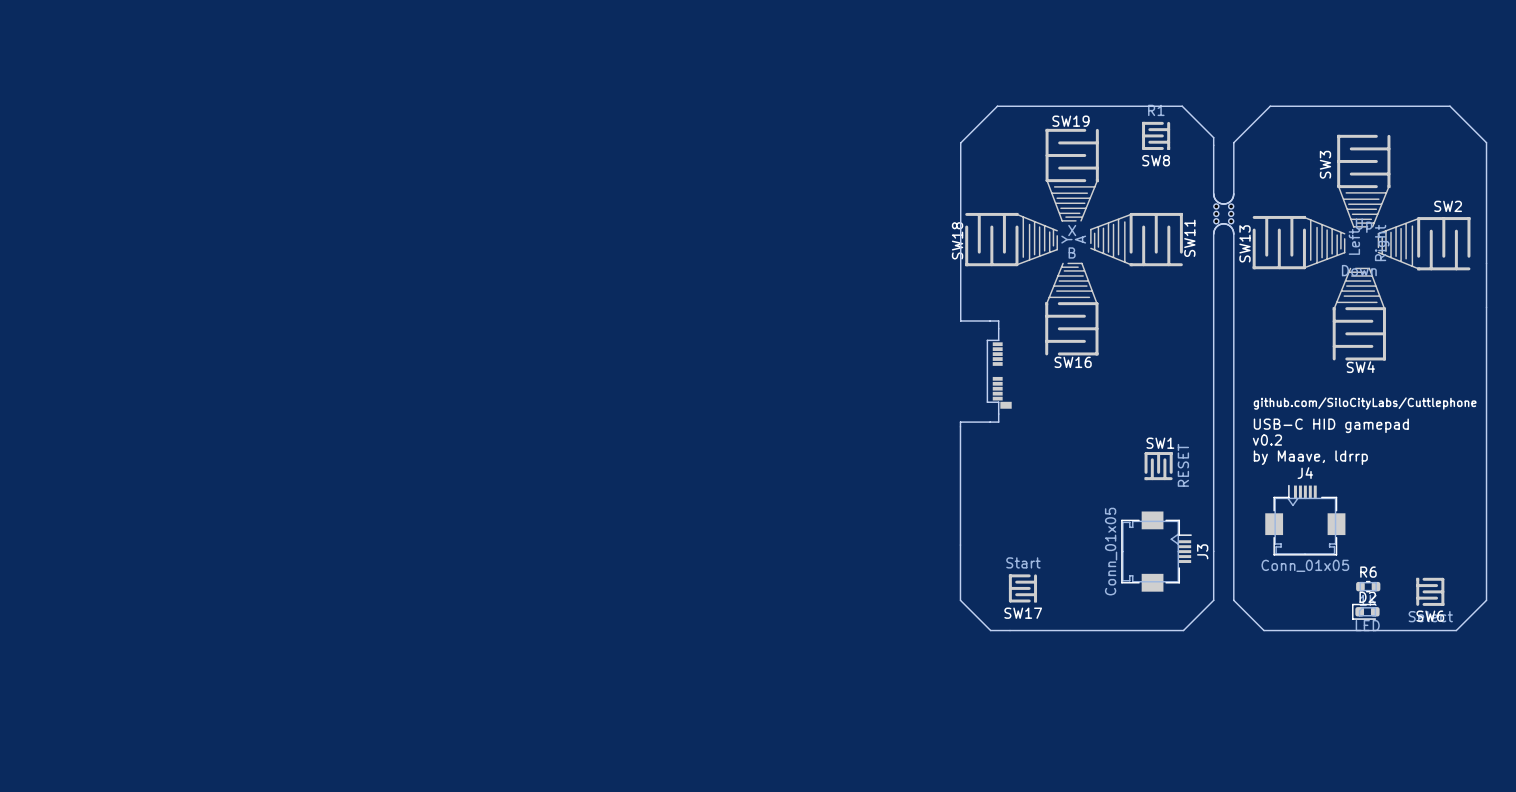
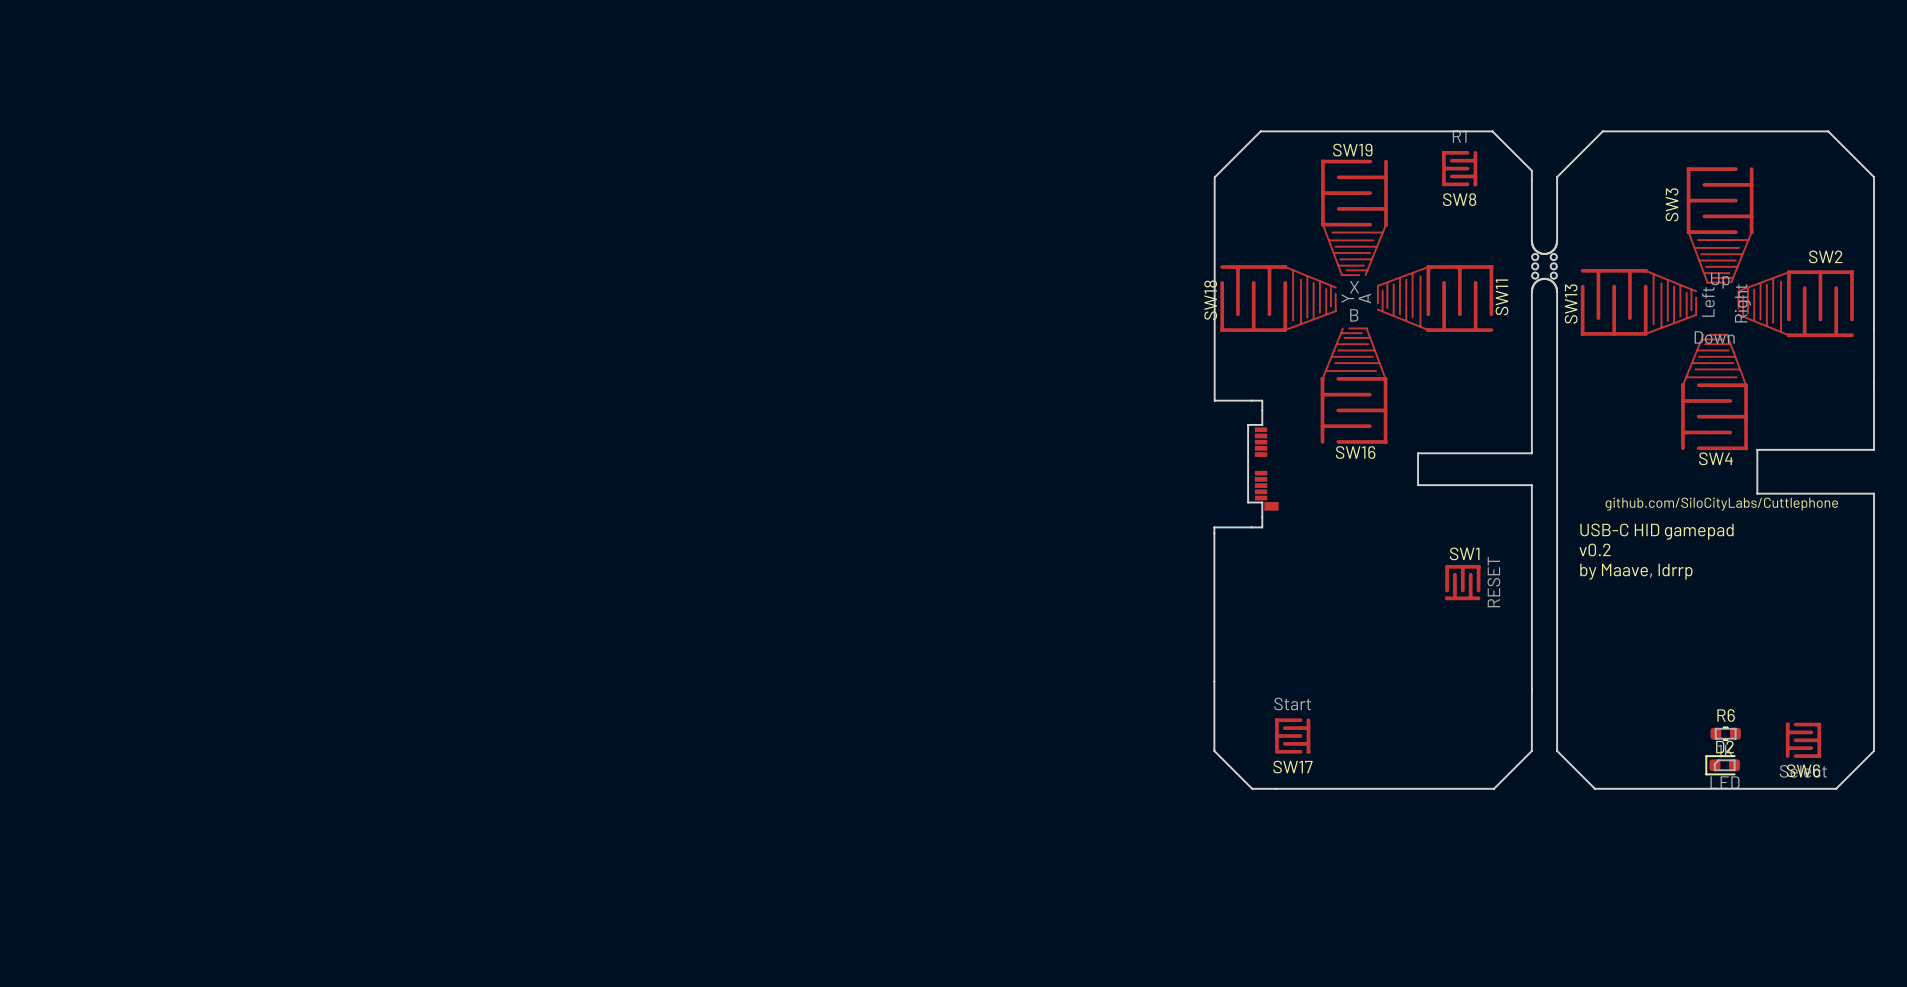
board edge: (1486, 360) (1486, 395) -> (1873, 449) (1757, 449) (1757, 493) (1873, 493)
board edge: (1213, 362) (1213, 388) -> (1531, 453) (1418, 453) (1418, 485) (1531, 485)
J4: Conn_01x05 (1305, 520) -> none
J3: Conn_01x05 (1156, 551) -> none

